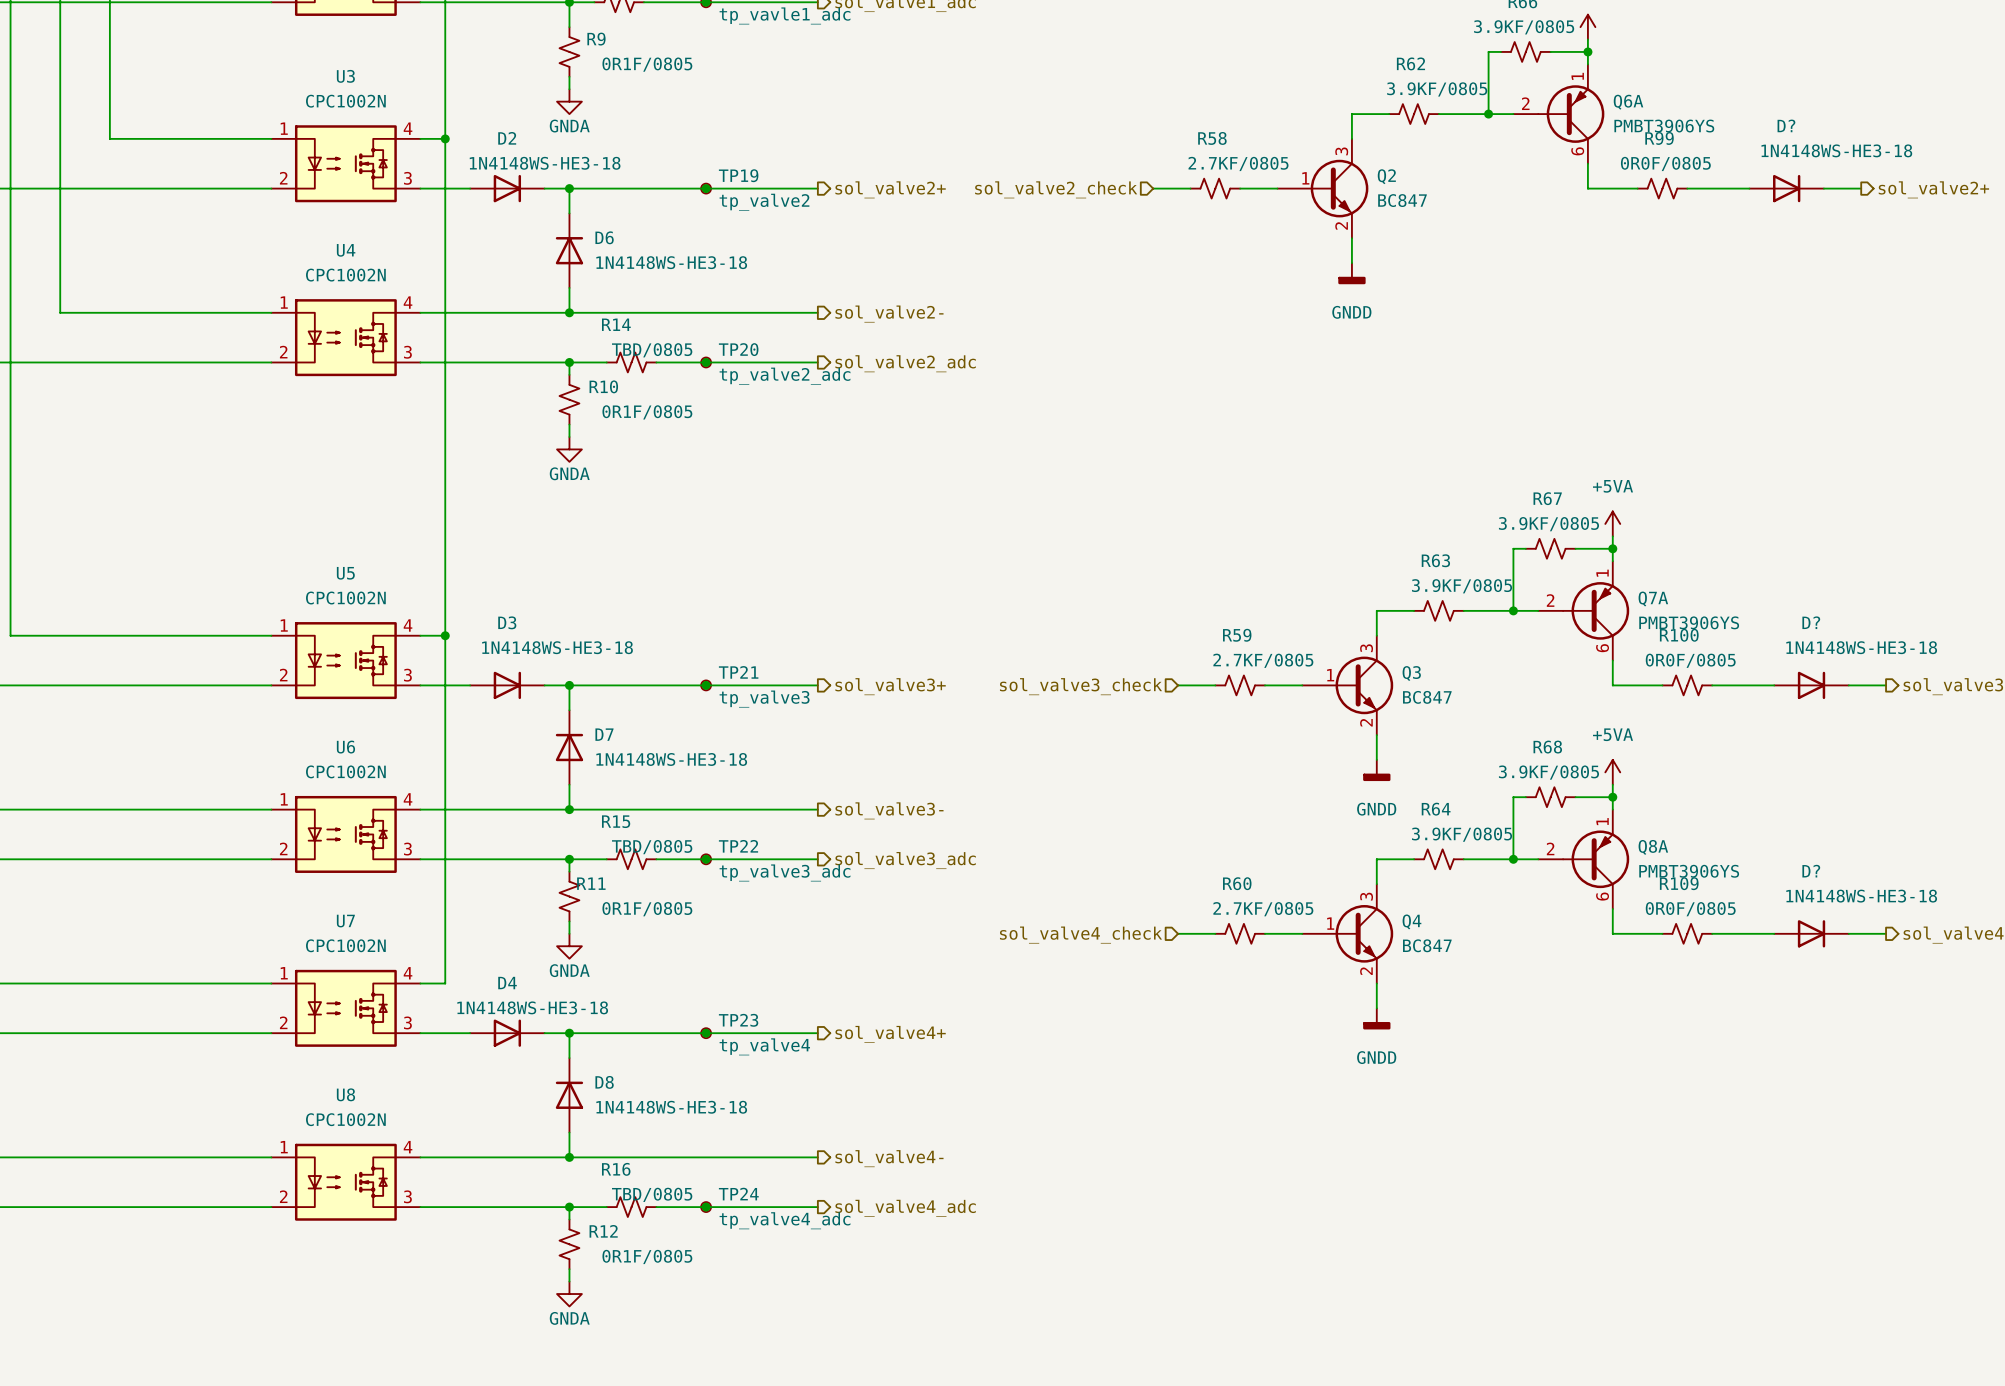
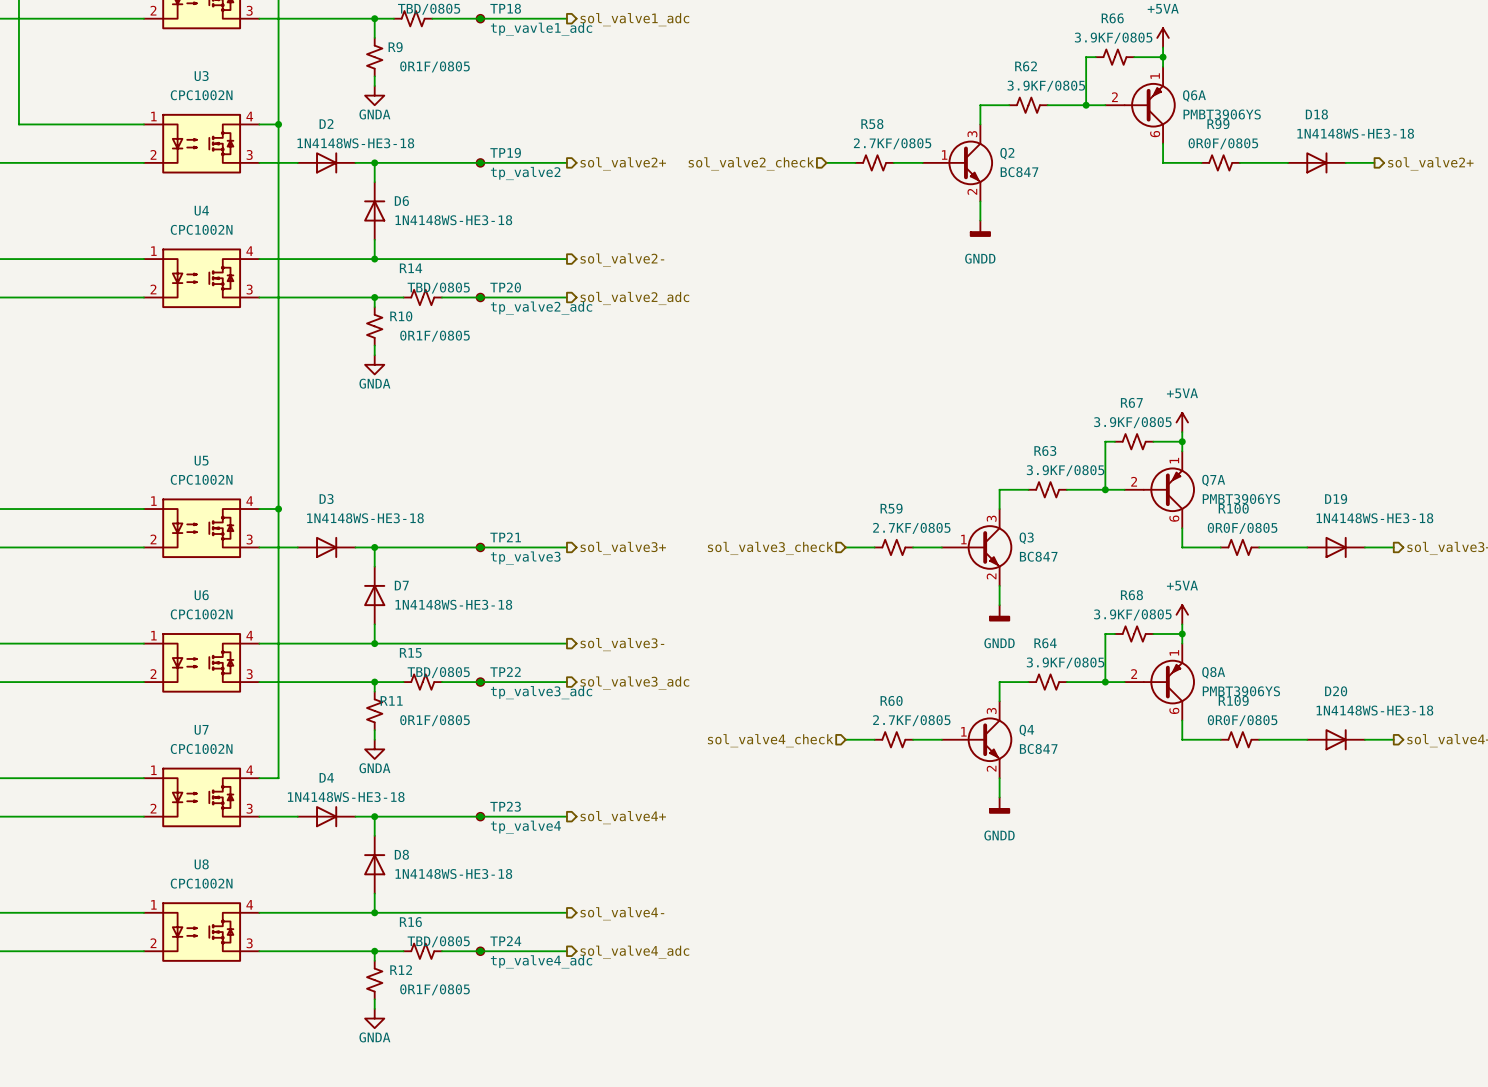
D? name: D? (1786, 125) -> D18 (1316, 114)
D? name: D? (1811, 622) -> D19 (1336, 499)
D? name: D? (1811, 871) -> D20 (1336, 691)

